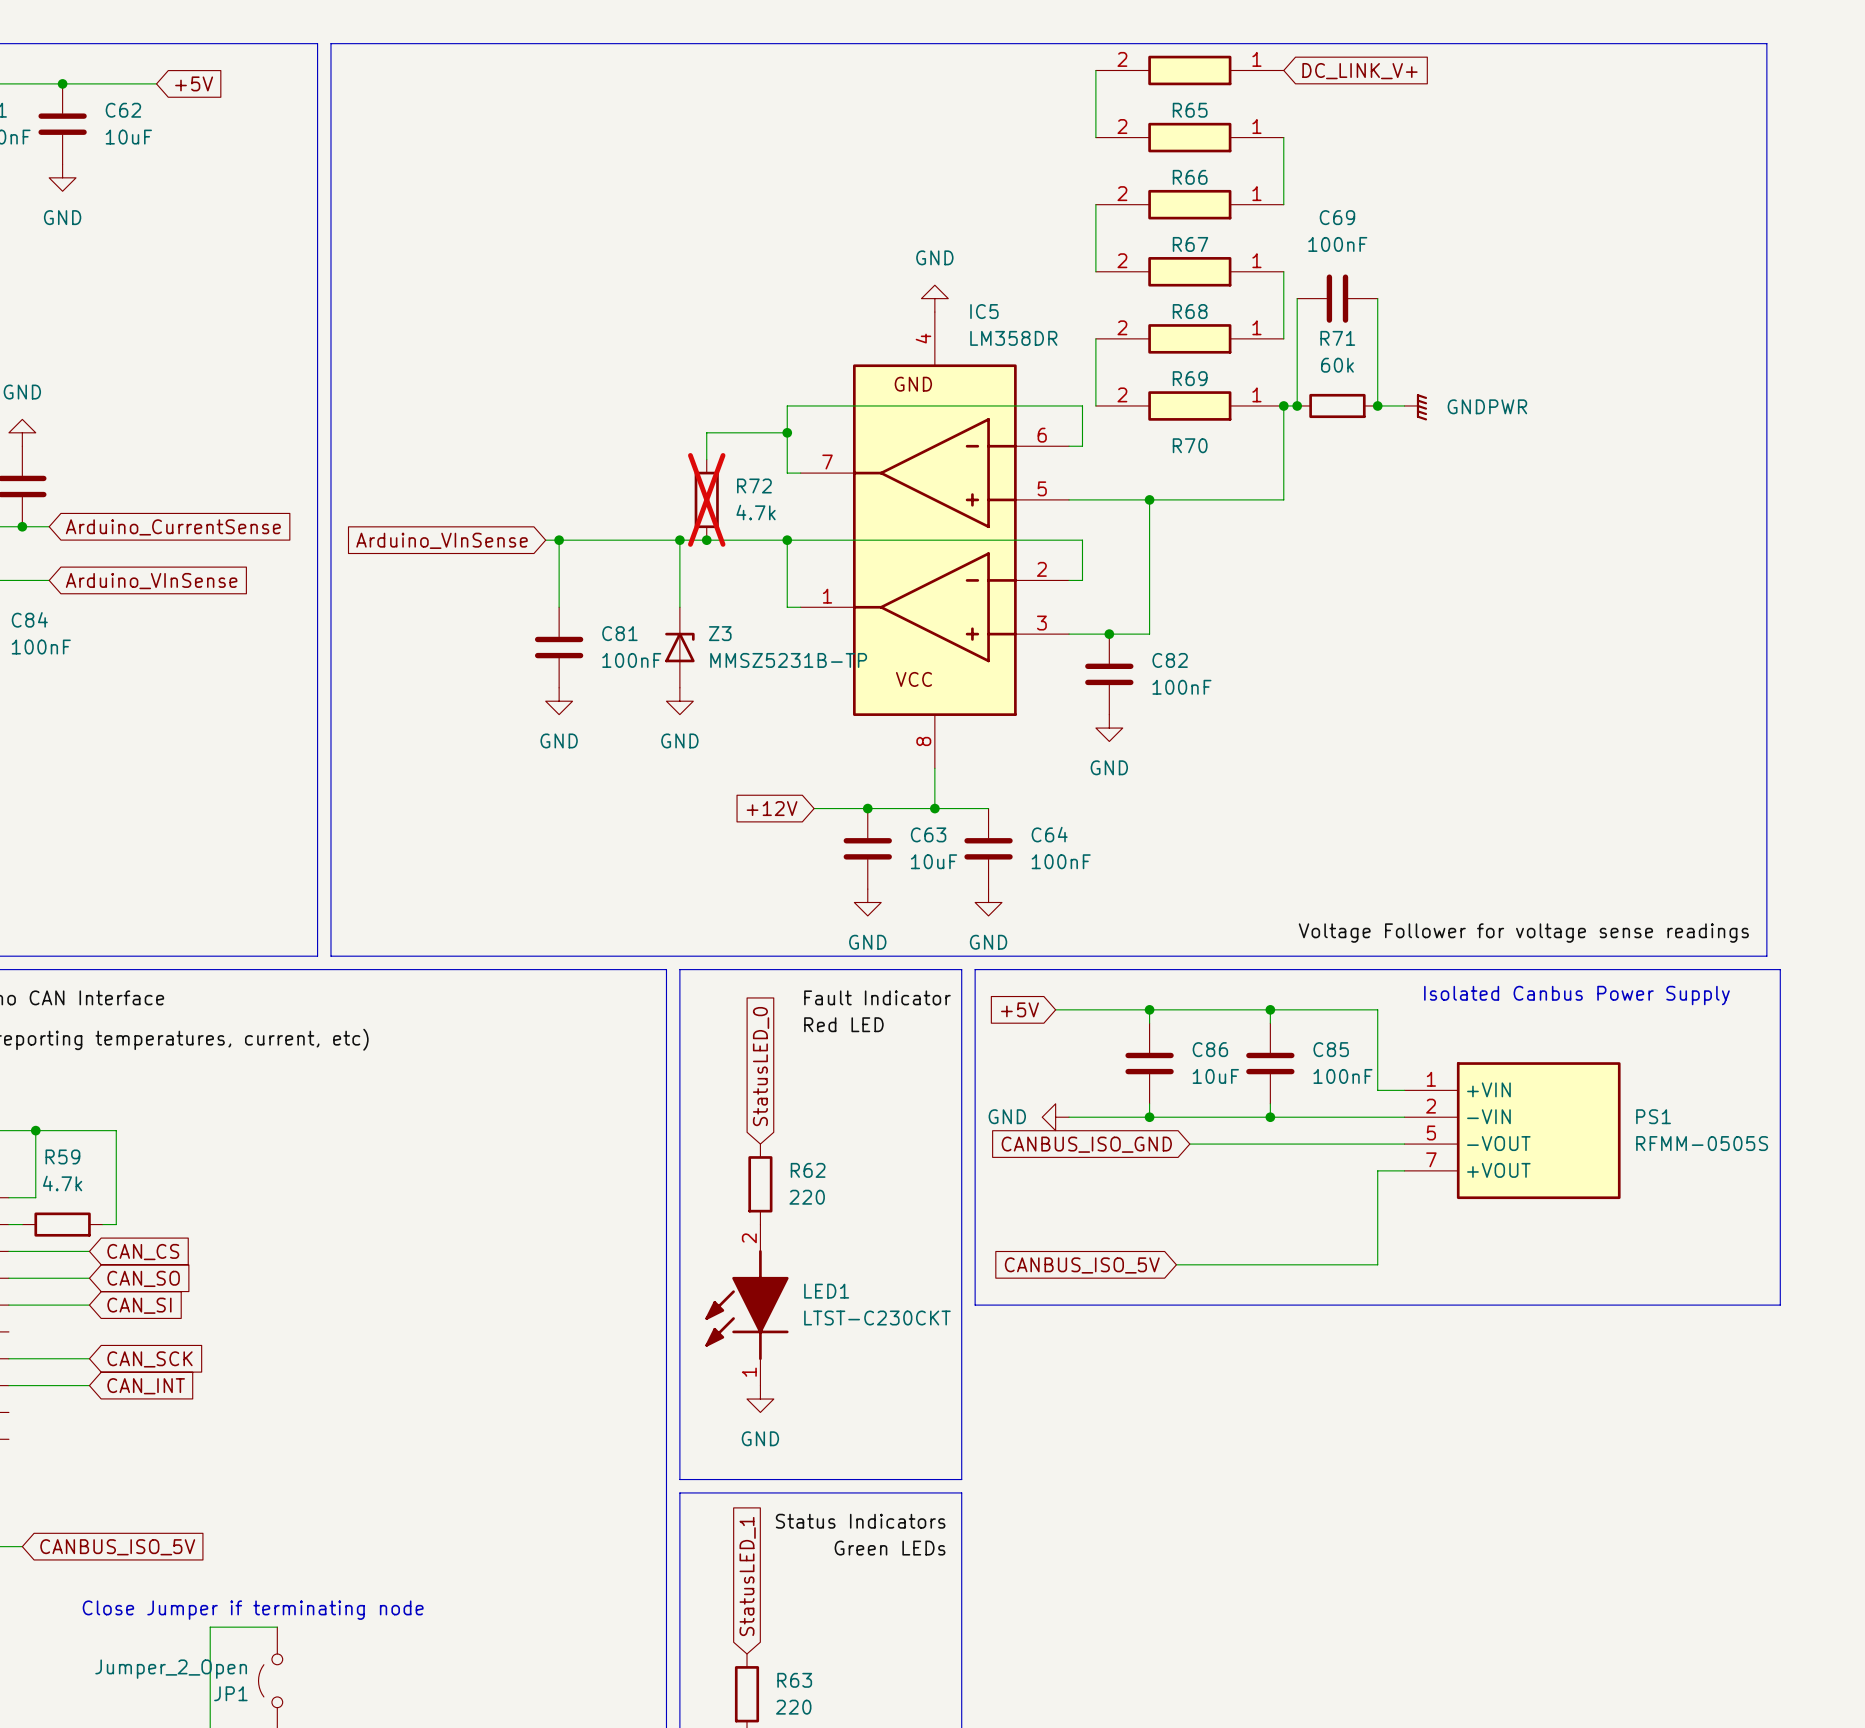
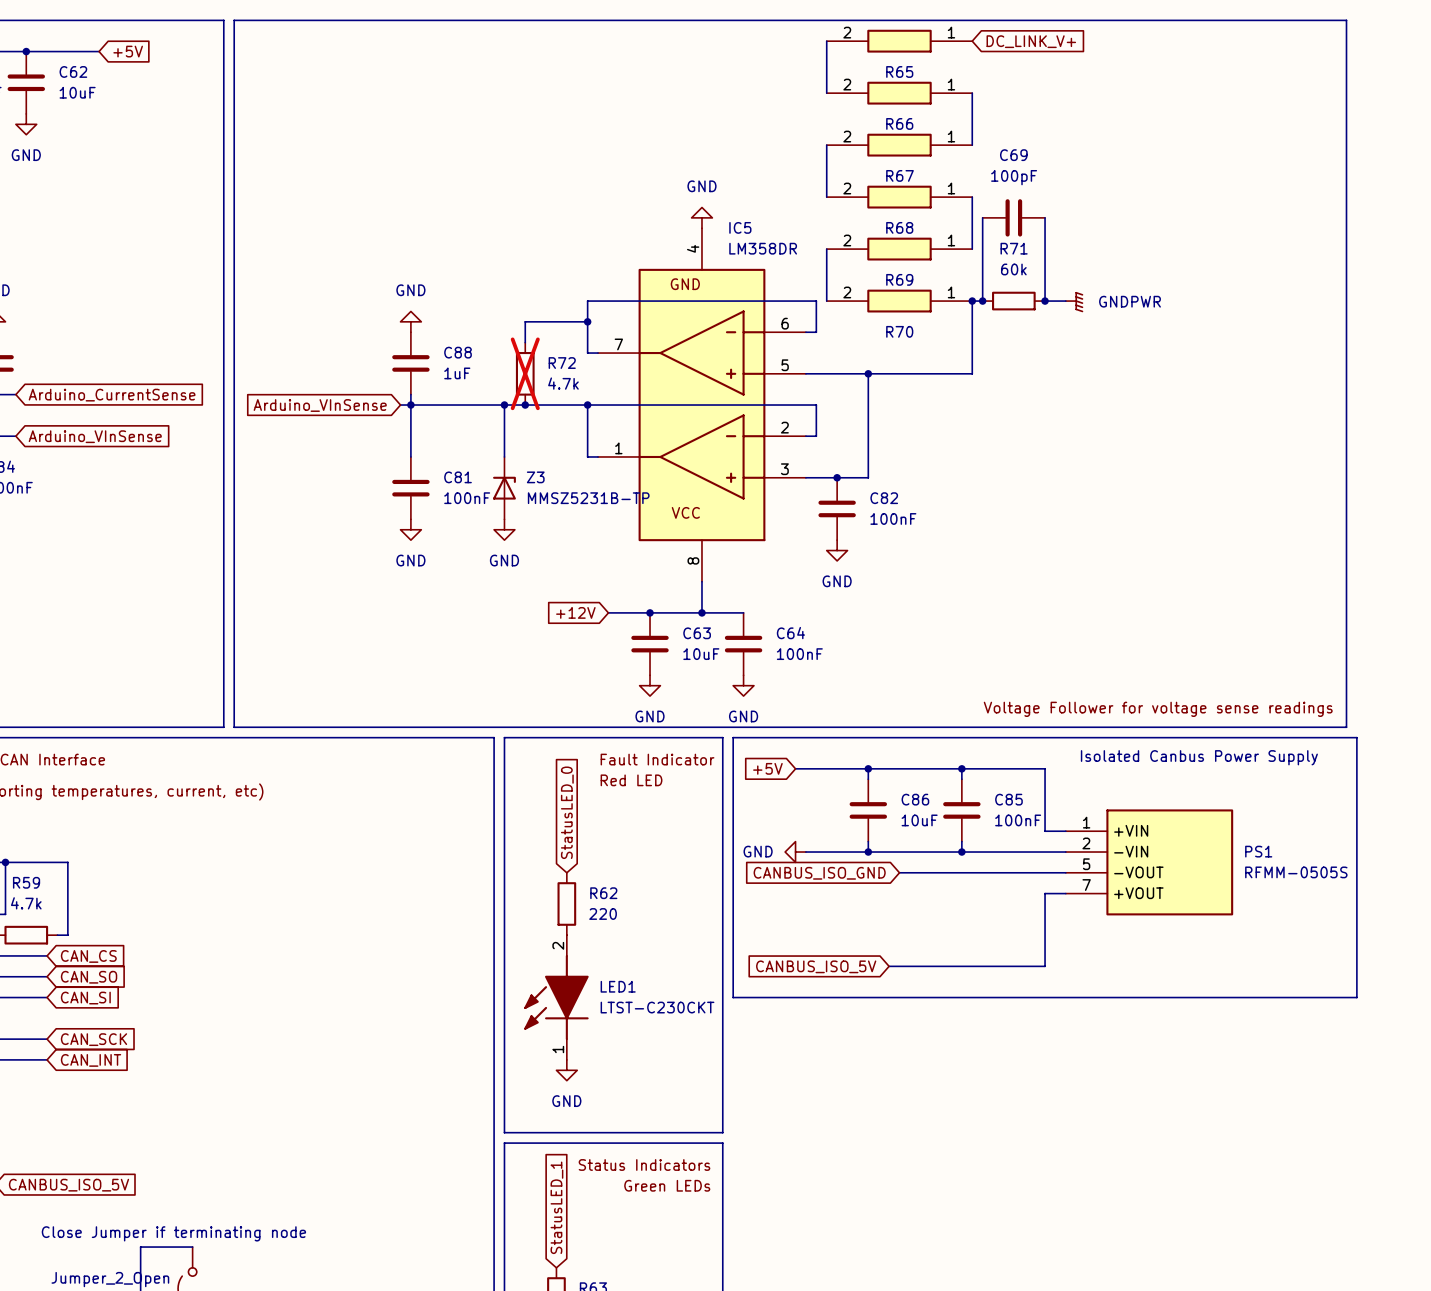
C69 value: 100nF (1337, 244) -> 100pF (1014, 177)
power symbol: none -> GND (410, 321)
C88: none -> 1uF (410, 363)
wire: none -> (410, 394) (410, 405)

